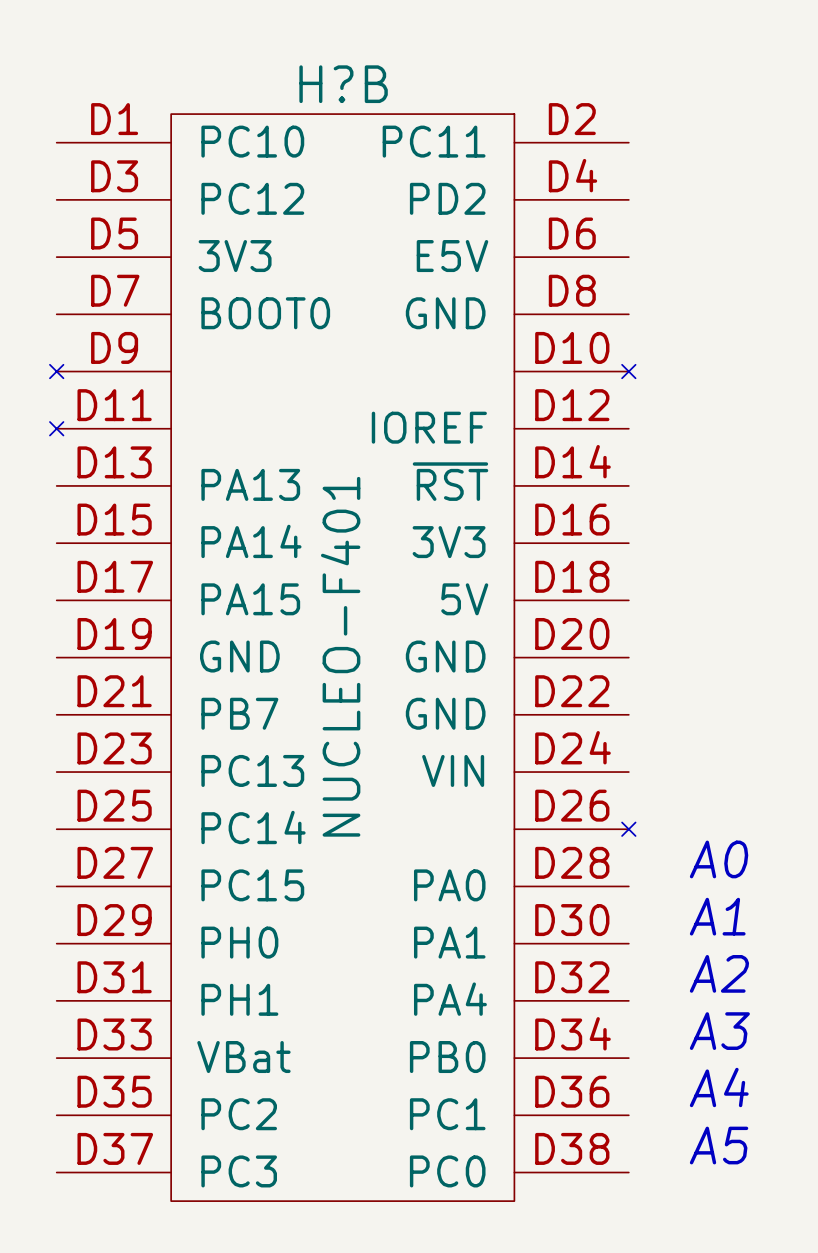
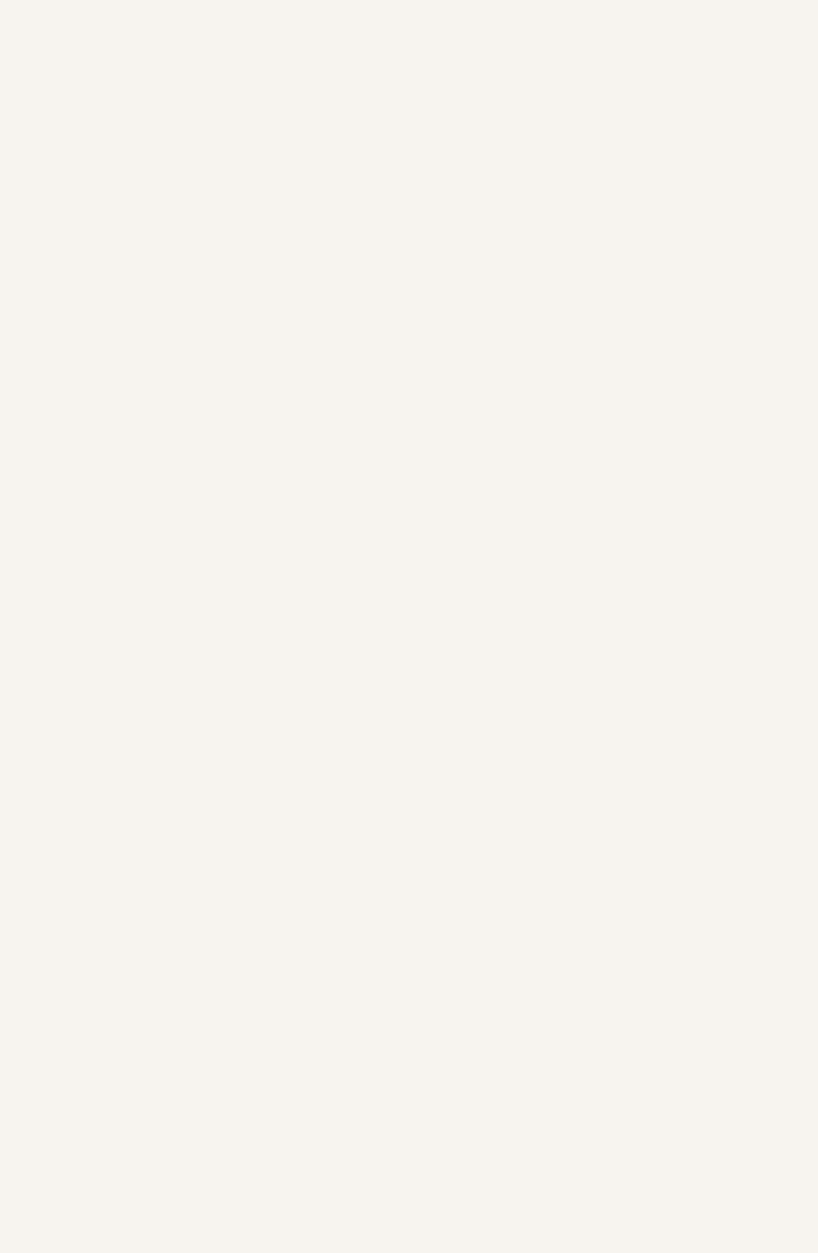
H?B: NUCLEO-F401 (342, 657) -> none
text: A0 (719, 859) -> none
text: A1 (717, 916) -> none
text: A2 (719, 973) -> none
text: A3 (719, 1031) -> none
text: A4 (719, 1087) -> none
text: A5 (719, 1145) -> none

